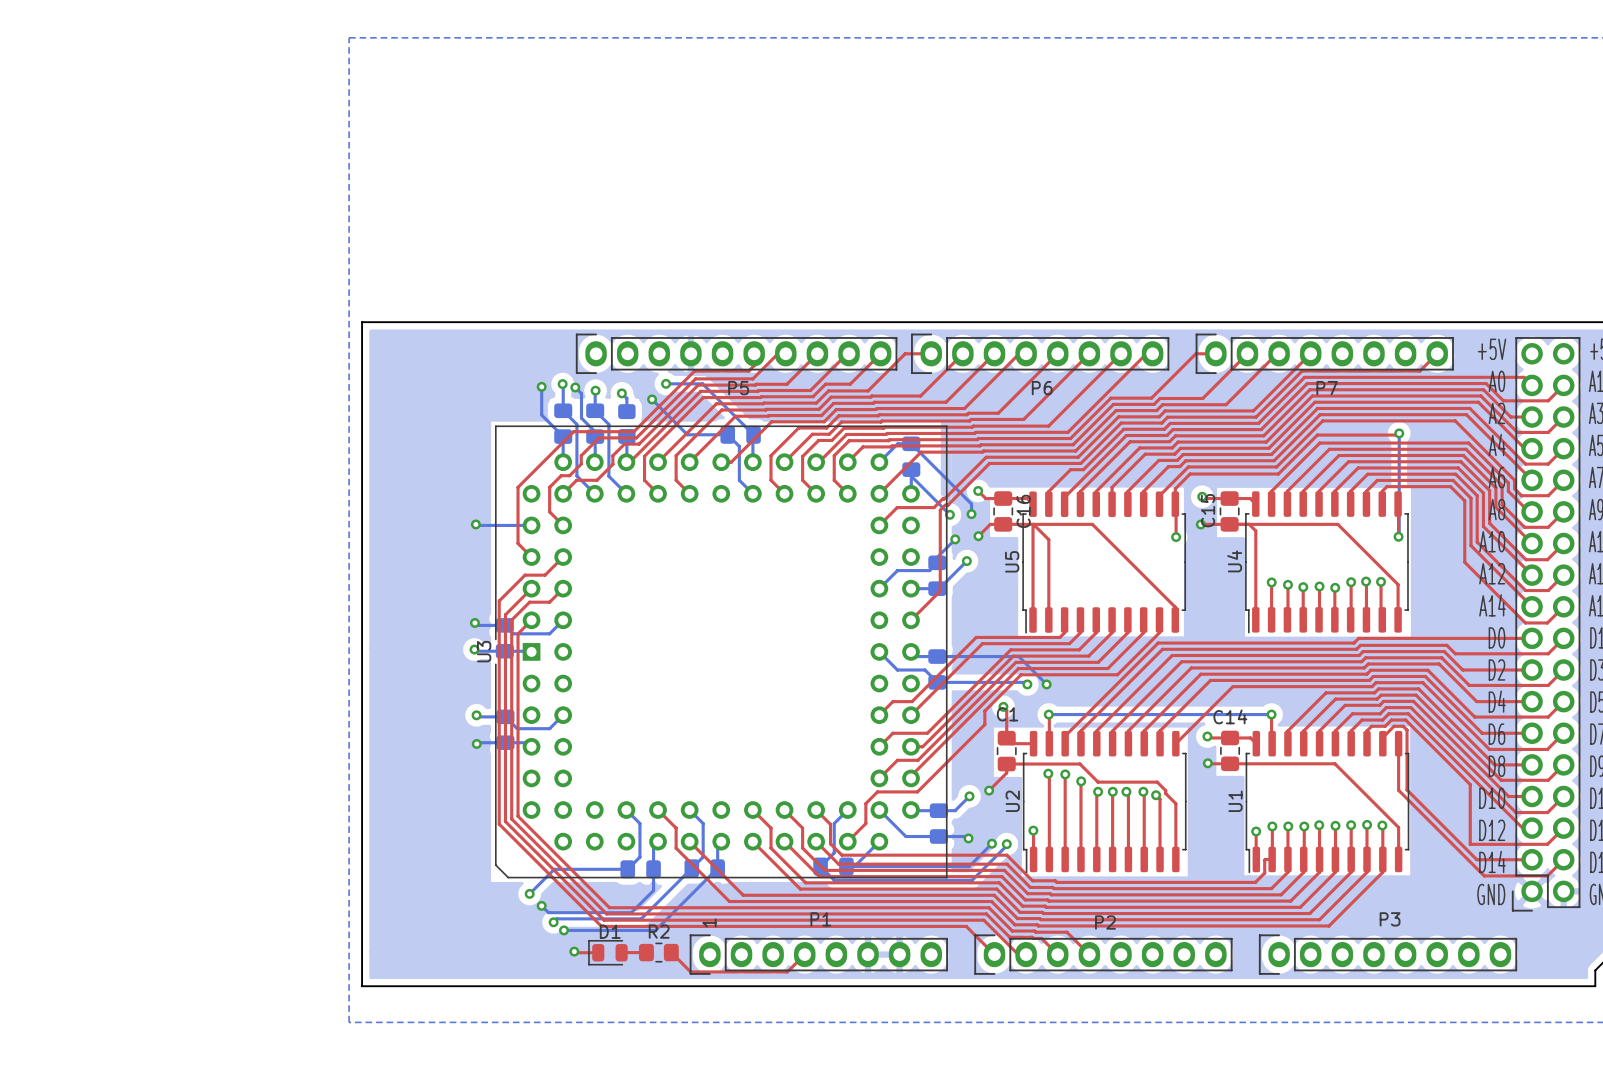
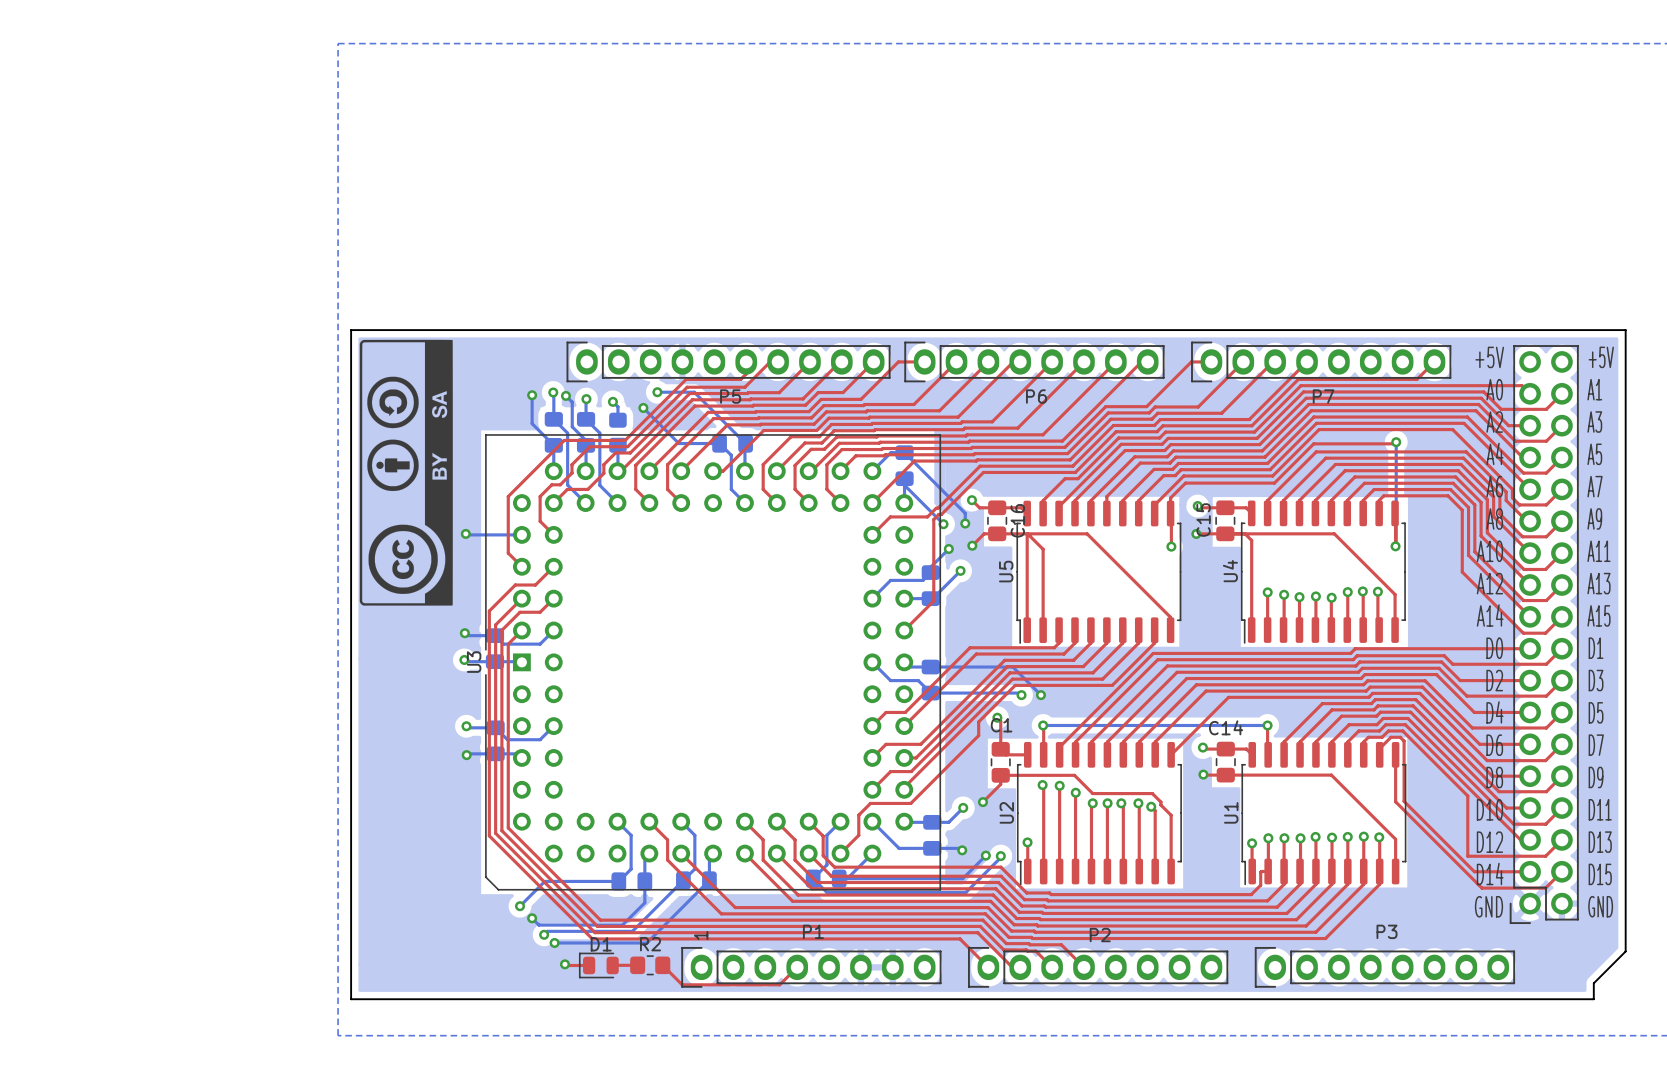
drawing: none -> [359, 339, 453, 606]

